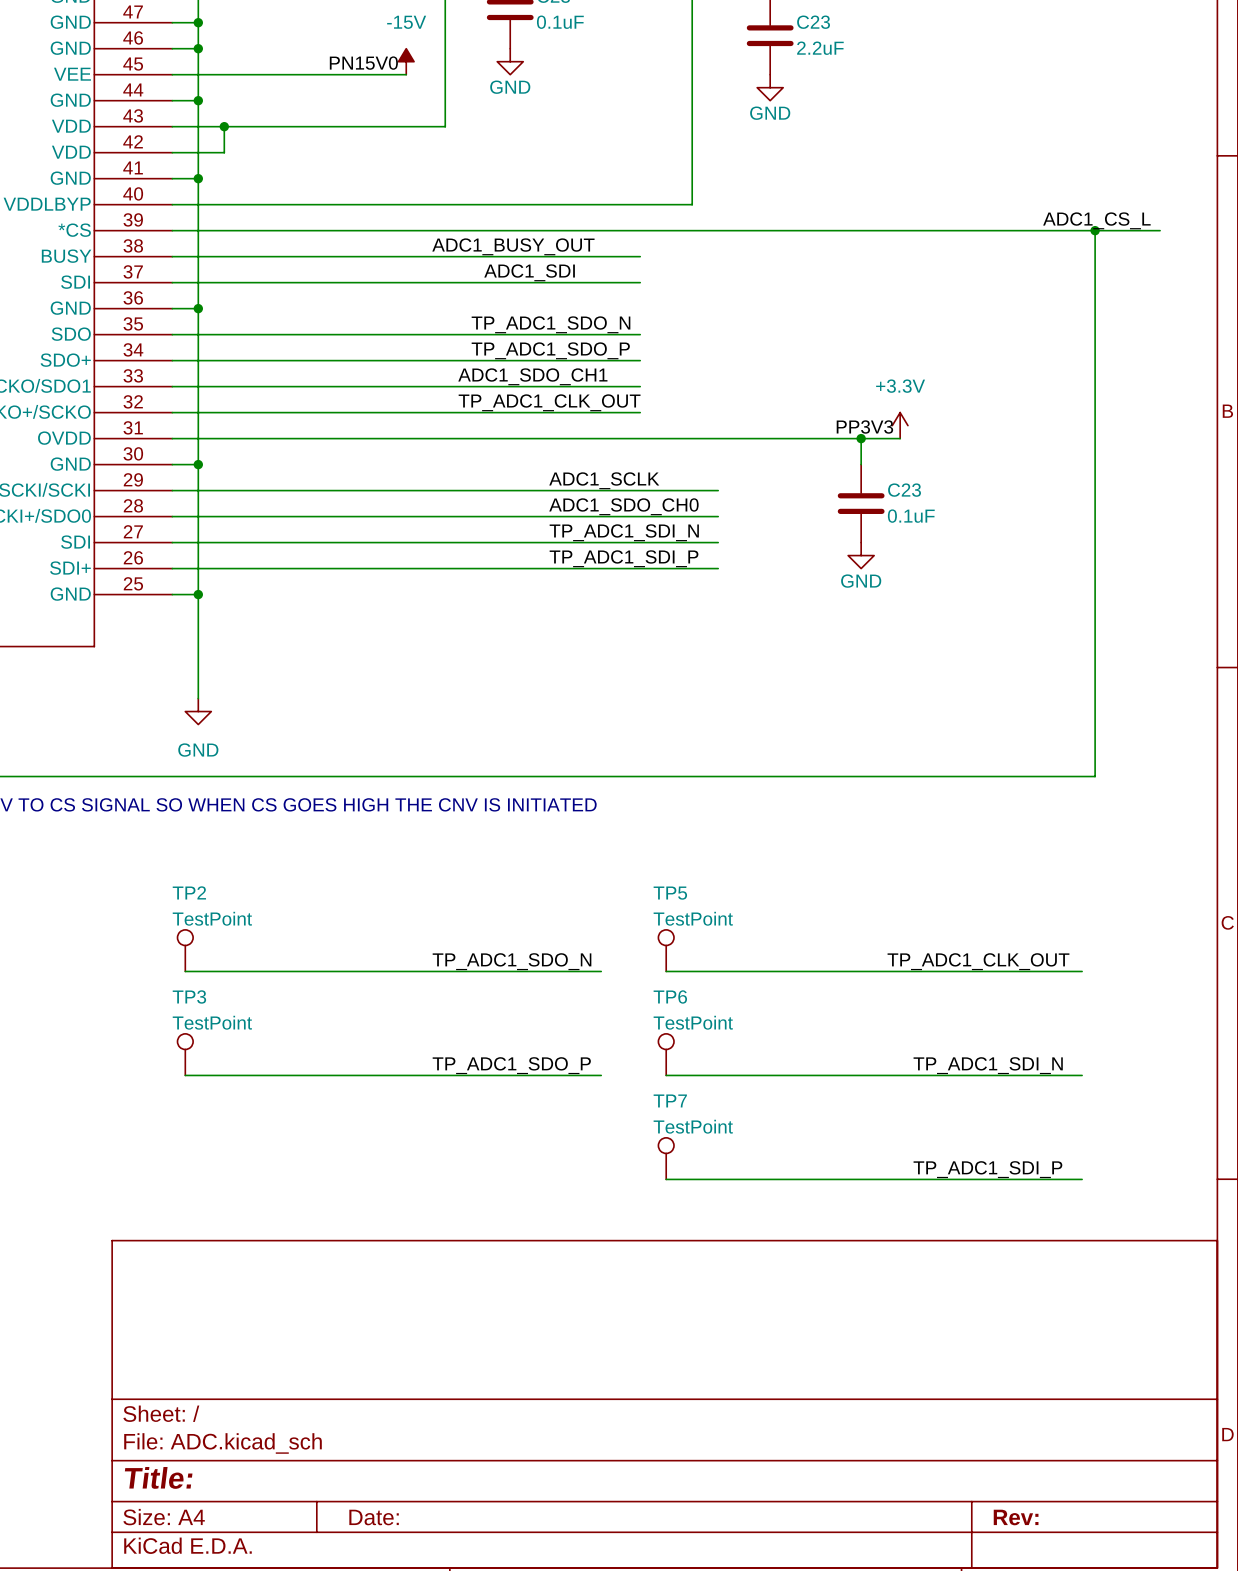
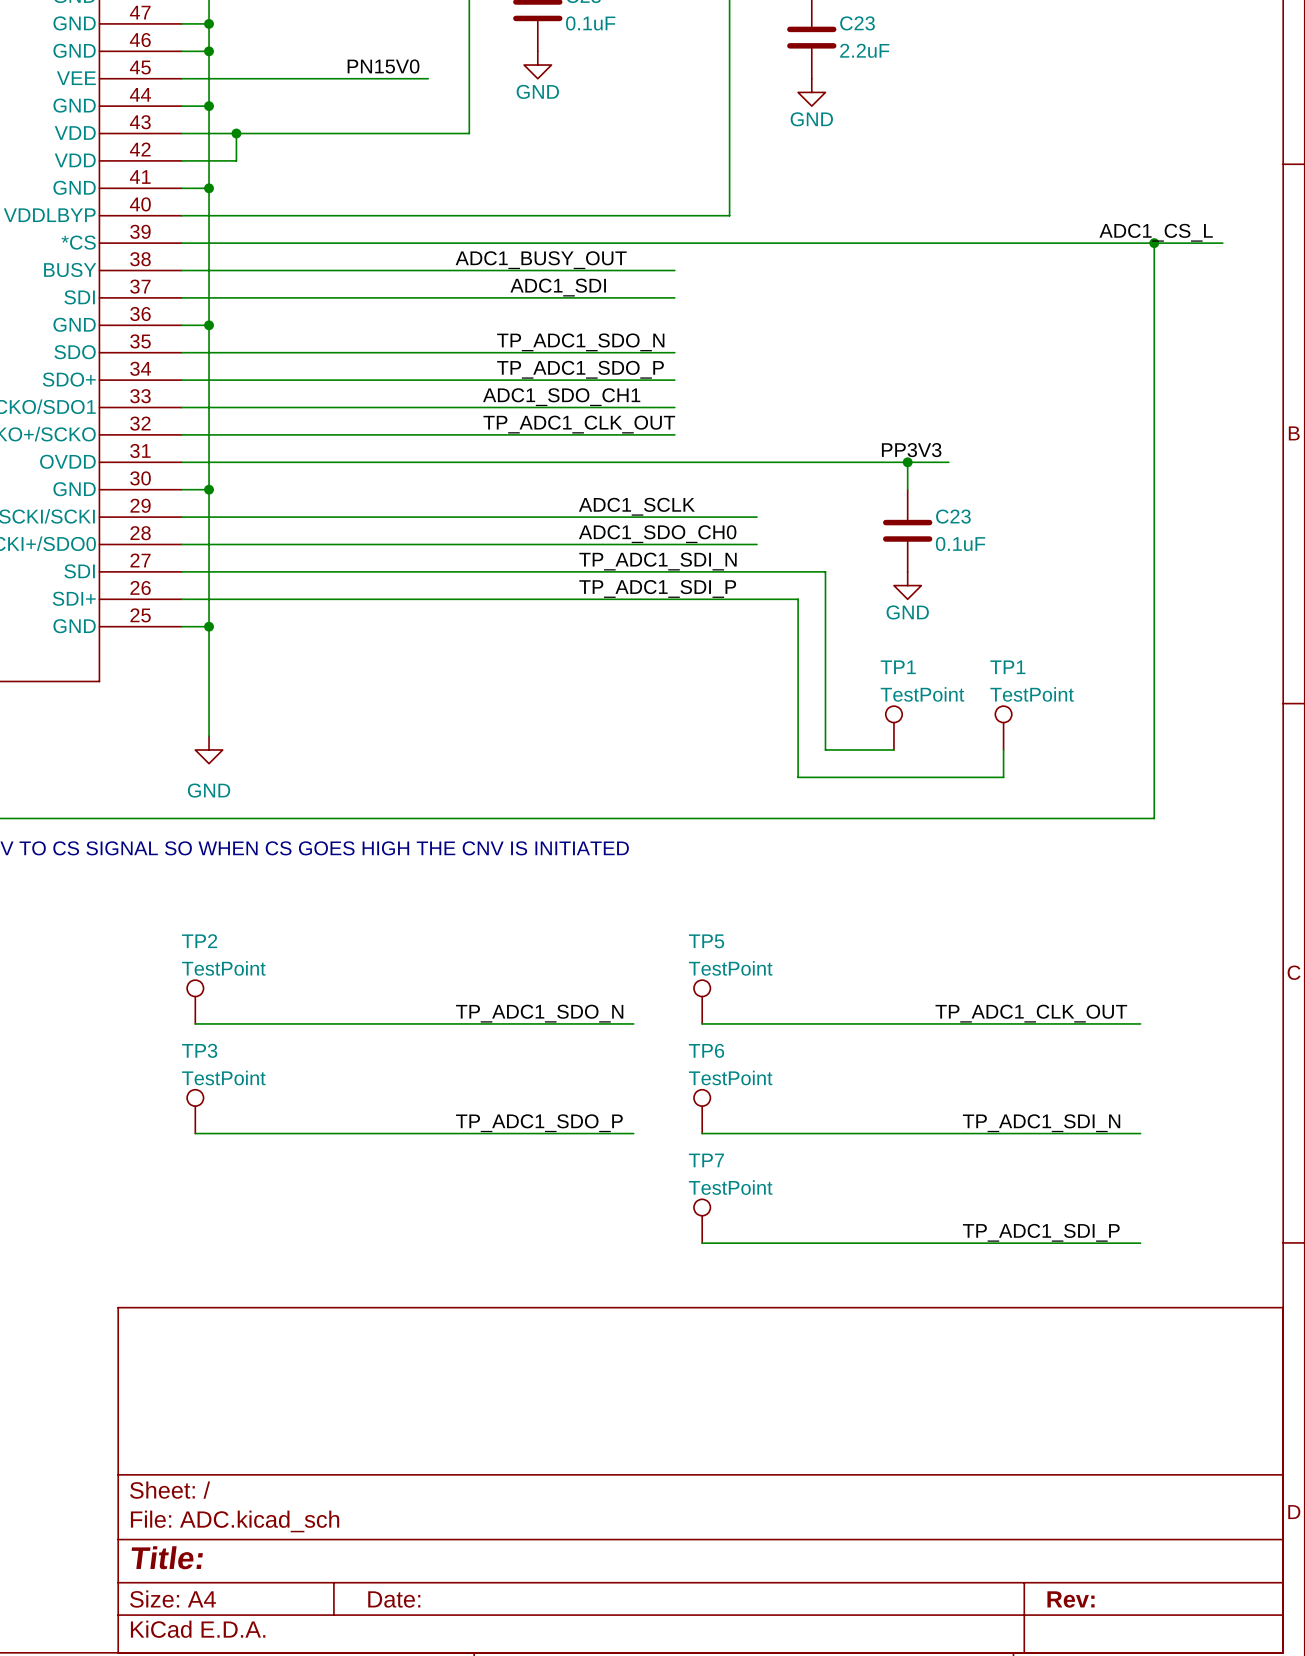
power symbol: -15V (406, 61) -> none
power symbol: +3.3V (900, 425) -> none
wire: none -> (756, 571) (825, 571) (825, 749) (893, 749)
wire: none -> (756, 599) (798, 599) (798, 777) (1003, 777) (1003, 749)
TP1: none -> TestPoint (893, 728)
TP1: none -> TestPoint (1003, 728)

